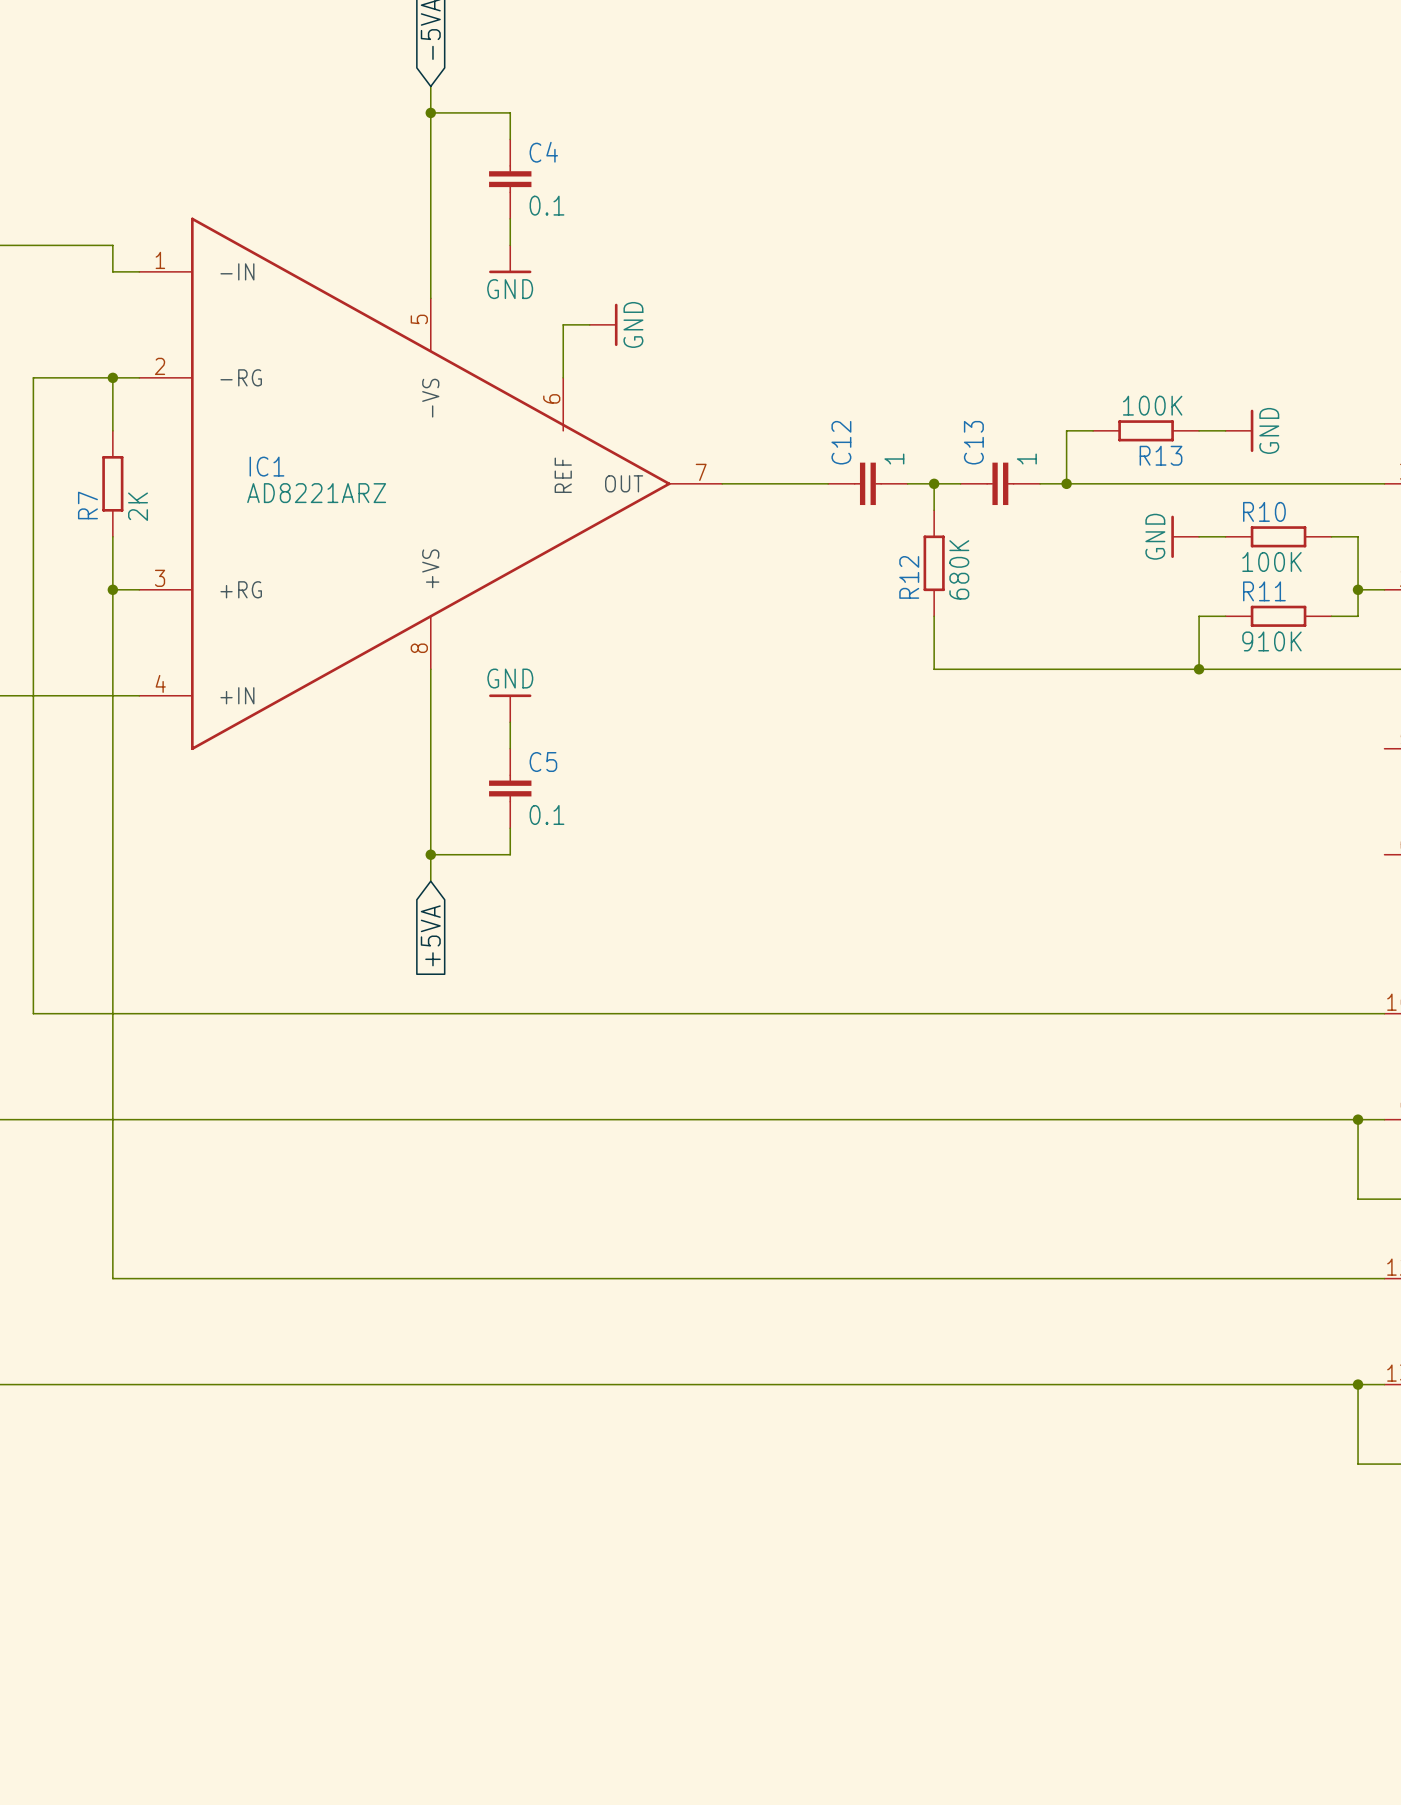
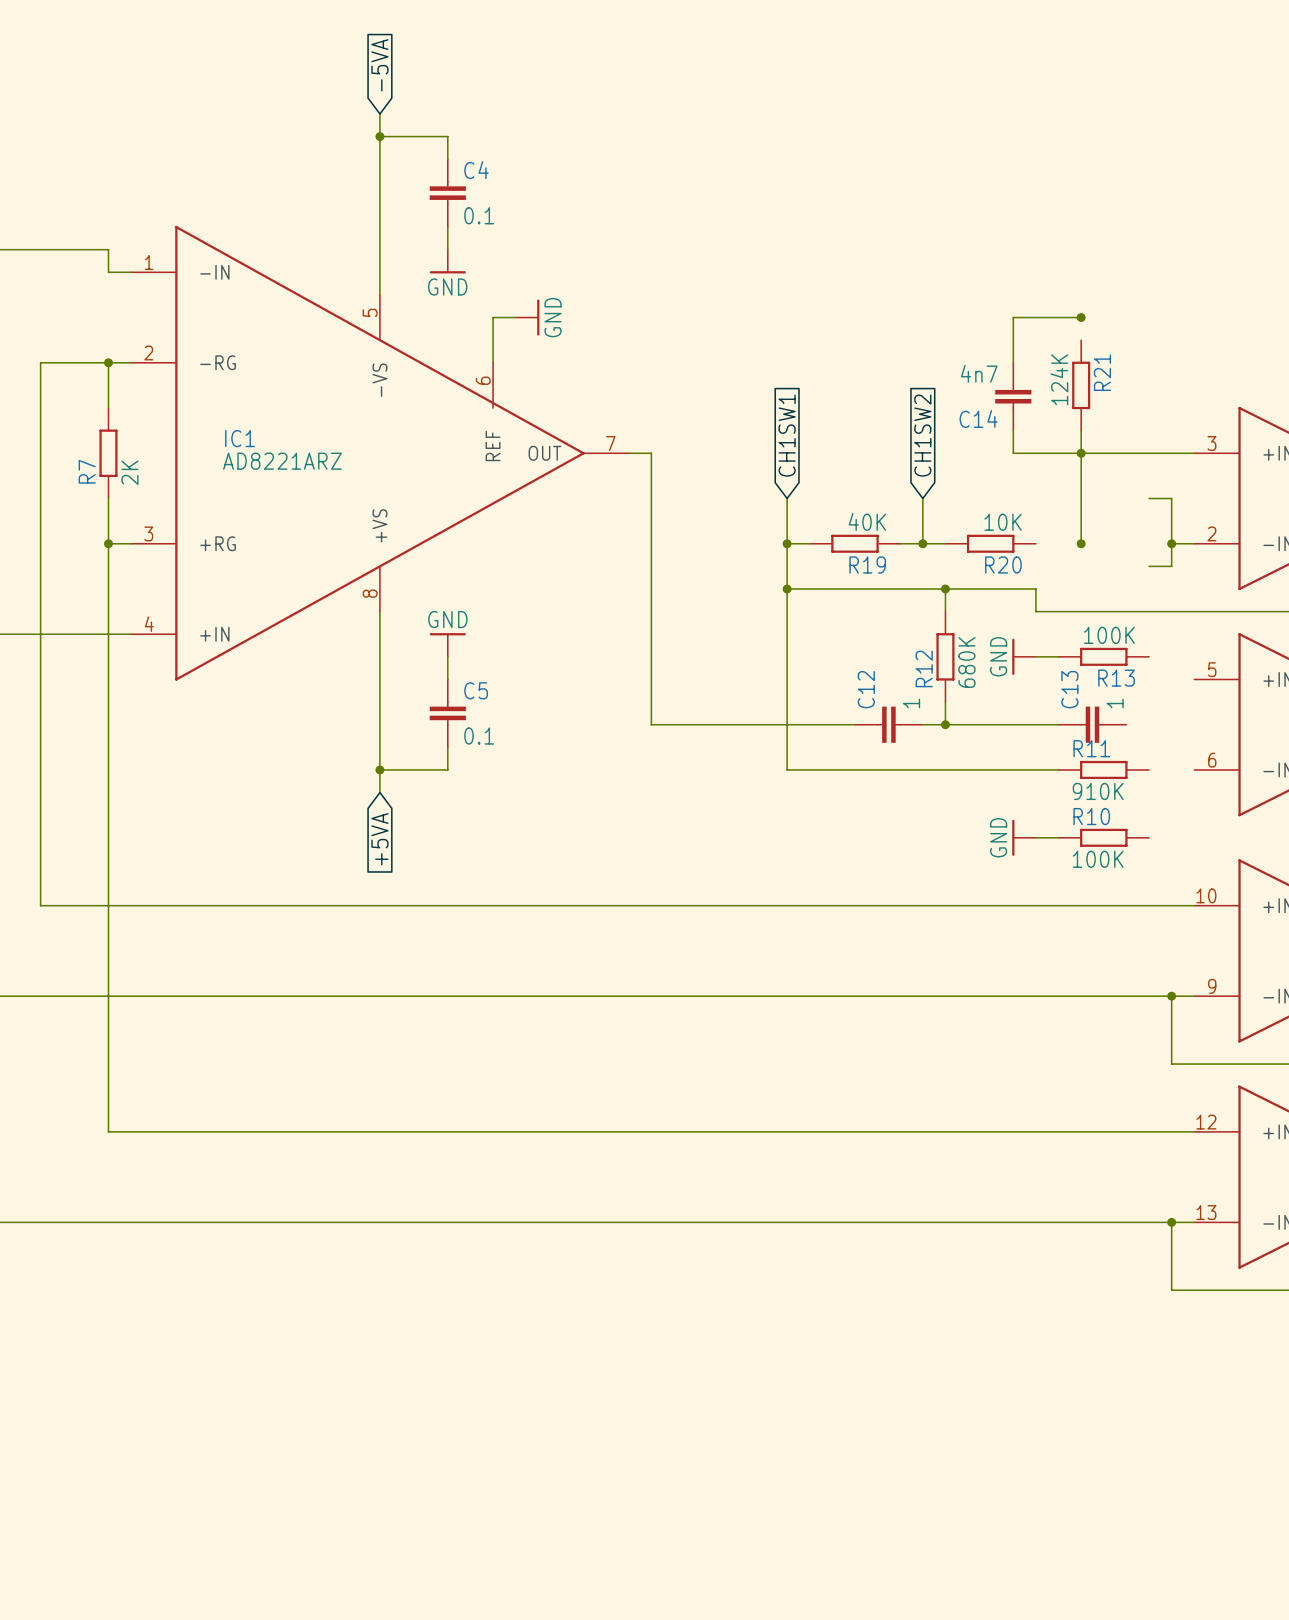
wire: none -> (1081, 317) (1013, 317) (1013, 362)
junction: none -> (1081, 317)
R21: none -> 124K (1081, 385)
C14: none -> 4n7 (1013, 396)
wire: (1093, 430) (1066, 430) (1066, 483) -> none
R13 position: (1146, 430) -> (1103, 656)
wire: (1199, 430) (1225, 430) -> none
power symbol: GND (1239, 430) -> none
wire: none -> (1081, 430) (1081, 543)
global label: none -> CH1SW1 (787, 435)
global label: none -> CH1SW2 (922, 435)
wire: (748, 483) (828, 483) -> (651, 453) (651, 724) (854, 724)
C12 position: (867, 483) -> (888, 724)
wire: (907, 483) (960, 483) -> (900, 543) (945, 543)
wire: (934, 483) (934, 510) -> (945, 589) (945, 611)
junction: (934, 483) -> none
C13 position: (1000, 483) -> (1092, 724)
wire: (1040, 483) (1172, 483) -> (1013, 430) (1013, 453)
junction: (1066, 483) -> none
junction: none -> (1081, 453)
wire: none -> (787, 498) (787, 769) (1058, 769)
wire: none -> (922, 498) (922, 543)
power symbol: GND (1185, 536) -> none
wire: (1199, 536) (1225, 536) -> (1035, 656) (1058, 656)
R10 position: (1278, 536) -> (1103, 837)
R12 position: (934, 563) -> (945, 656)
junction: none -> (787, 543)
R19: none -> 40K (854, 543)
junction: none -> (922, 543)
R20: none -> 10K (990, 543)
junction: none -> (1081, 543)
wire: (934, 616) (934, 669) (1199, 669) -> none
wire: (1225, 616) (1199, 616) (1199, 642) -> (787, 589) (1035, 589)
R11 position: (1278, 616) -> (1103, 769)
junction: none -> (787, 589)
junction: none -> (945, 589)
junction: (1199, 669) -> none
power symbol: none -> GND (1024, 656)
wire: none -> (945, 702) (945, 724)
wire: none -> (922, 724) (1058, 724)
junction: none -> (945, 724)
power symbol: none -> GND (1024, 837)
wire: none -> (1035, 837) (1058, 837)

